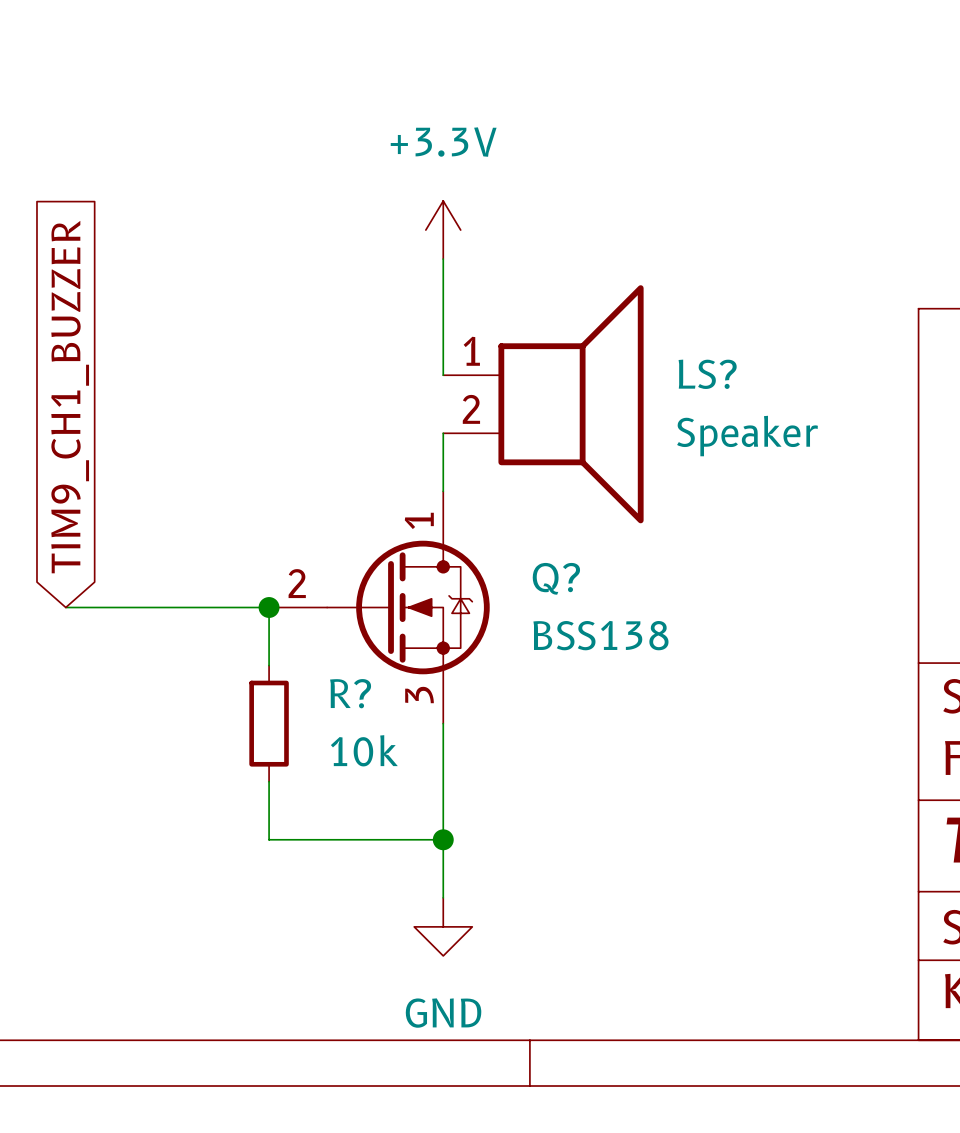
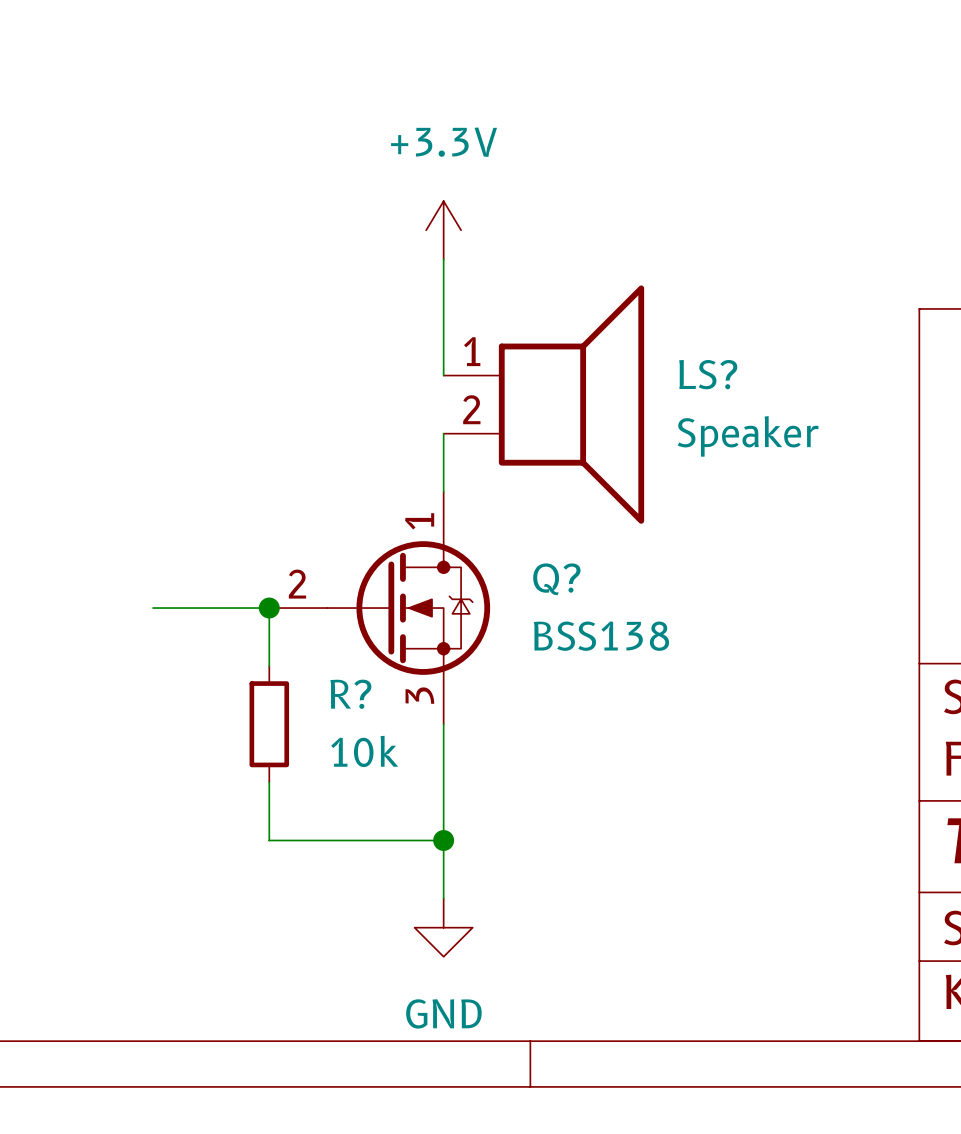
global label: TIM9_CH1_BUZZER (70, 397) -> none
wire: (65, 607) (152, 607) -> none

